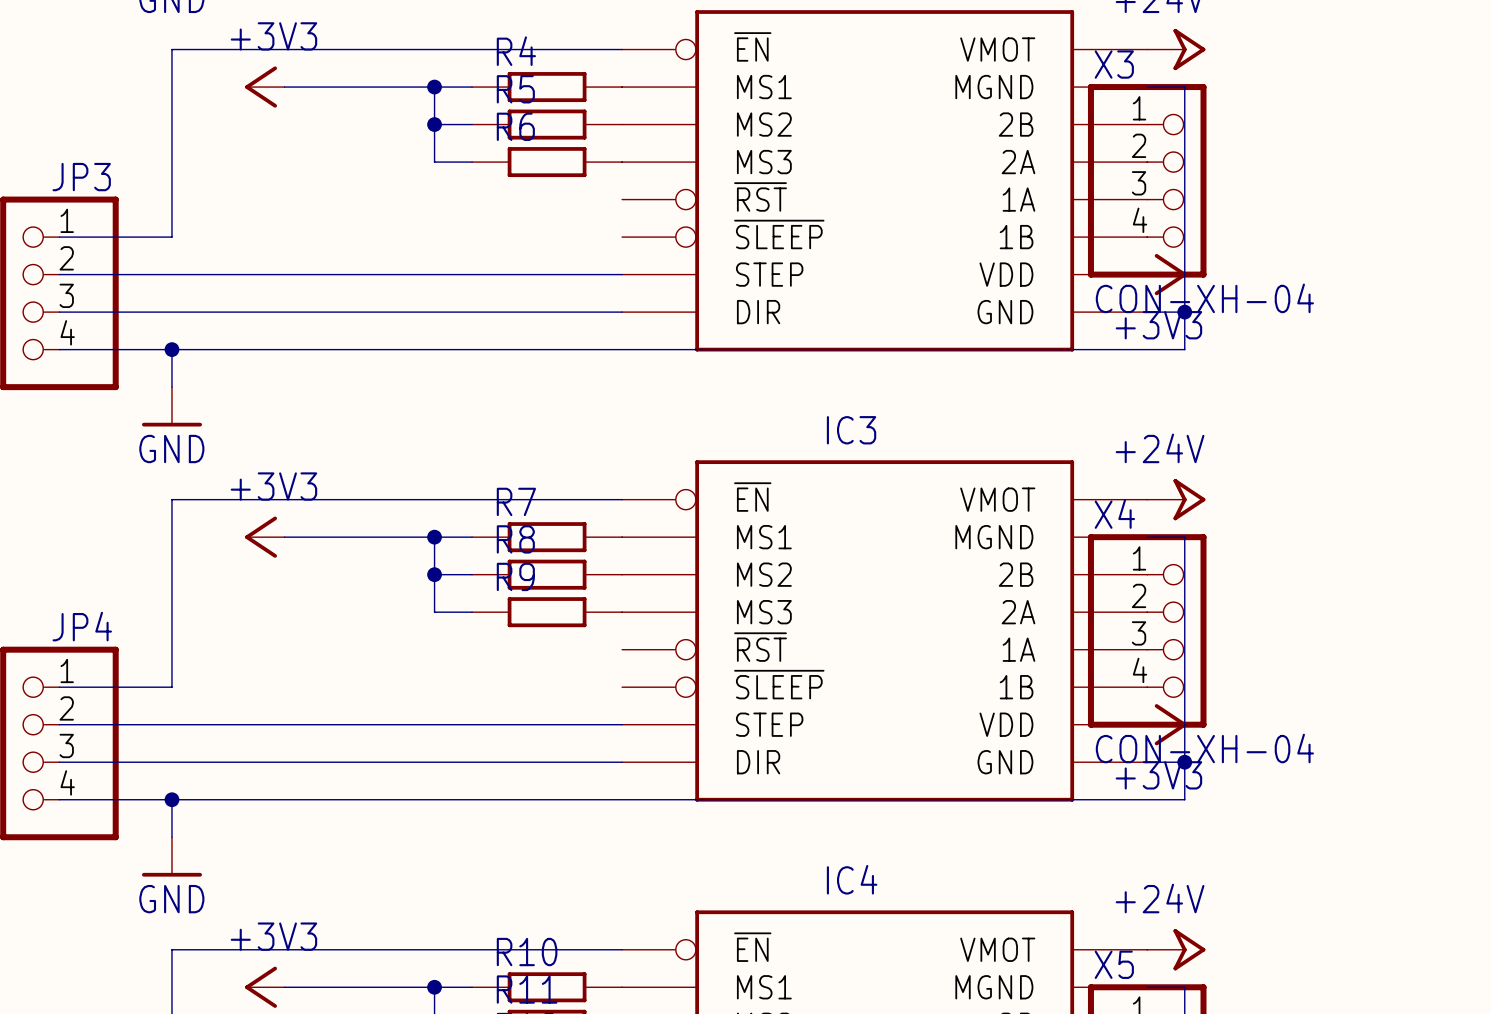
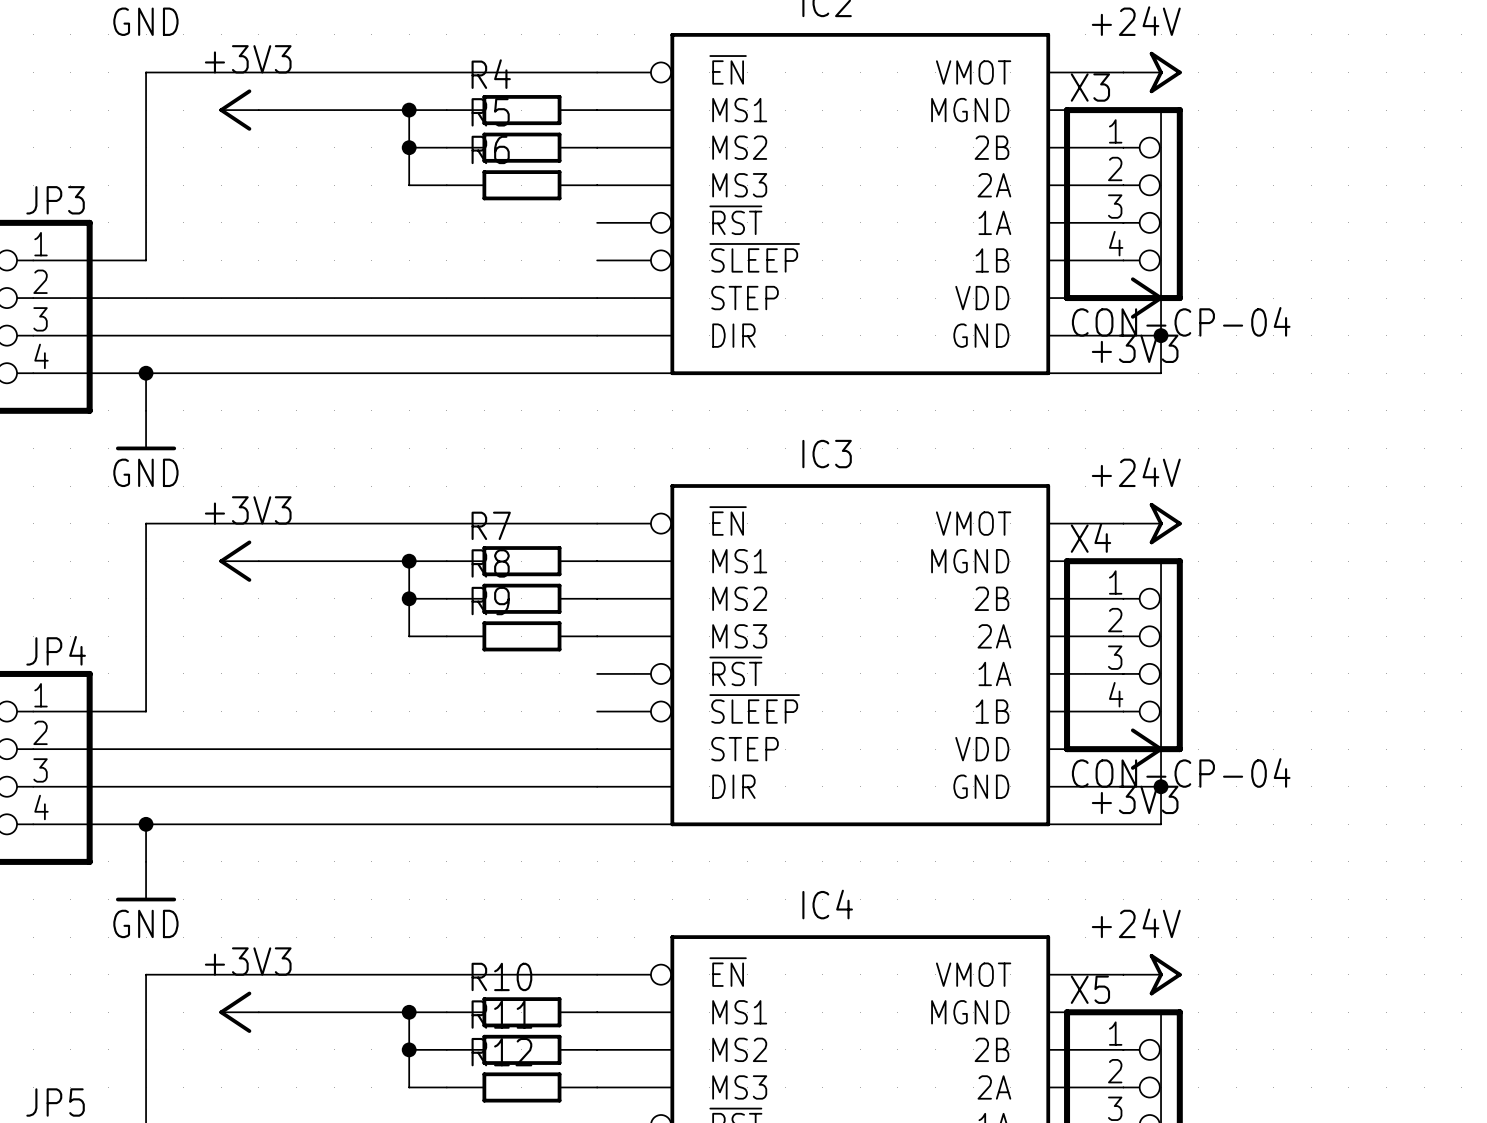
X3 value: CON-XH-04 (1204, 298) -> CON-CP-04 (1181, 321)
X4 value: CON-XH-04 (1204, 748) -> CON-CP-04 (1181, 772)

